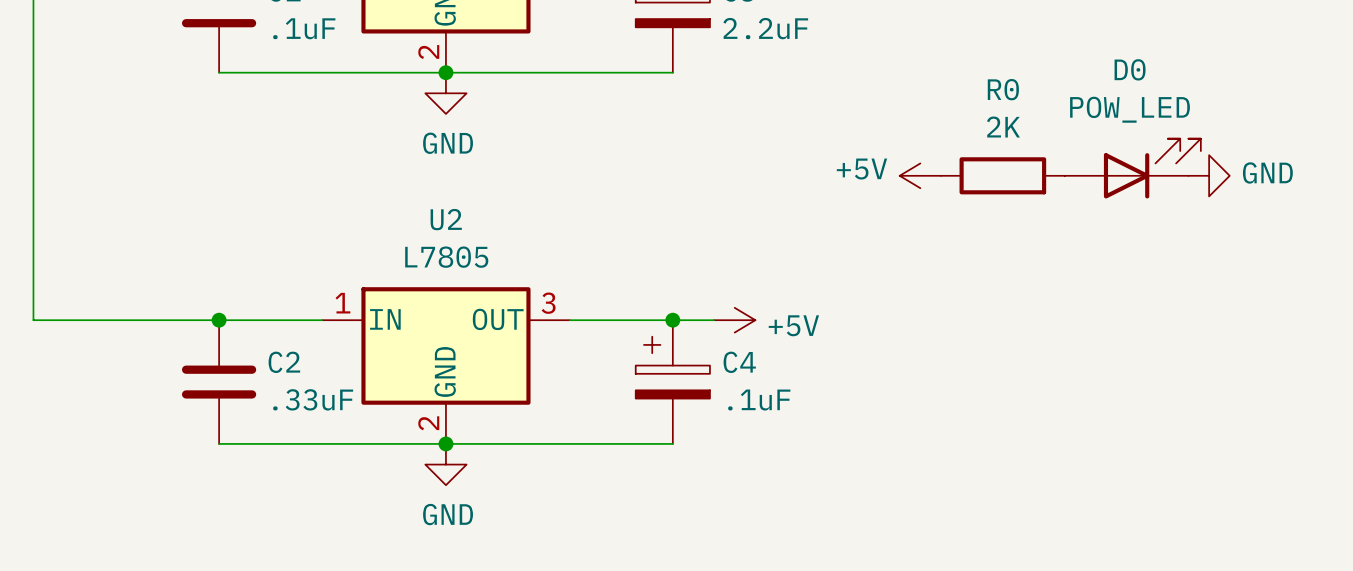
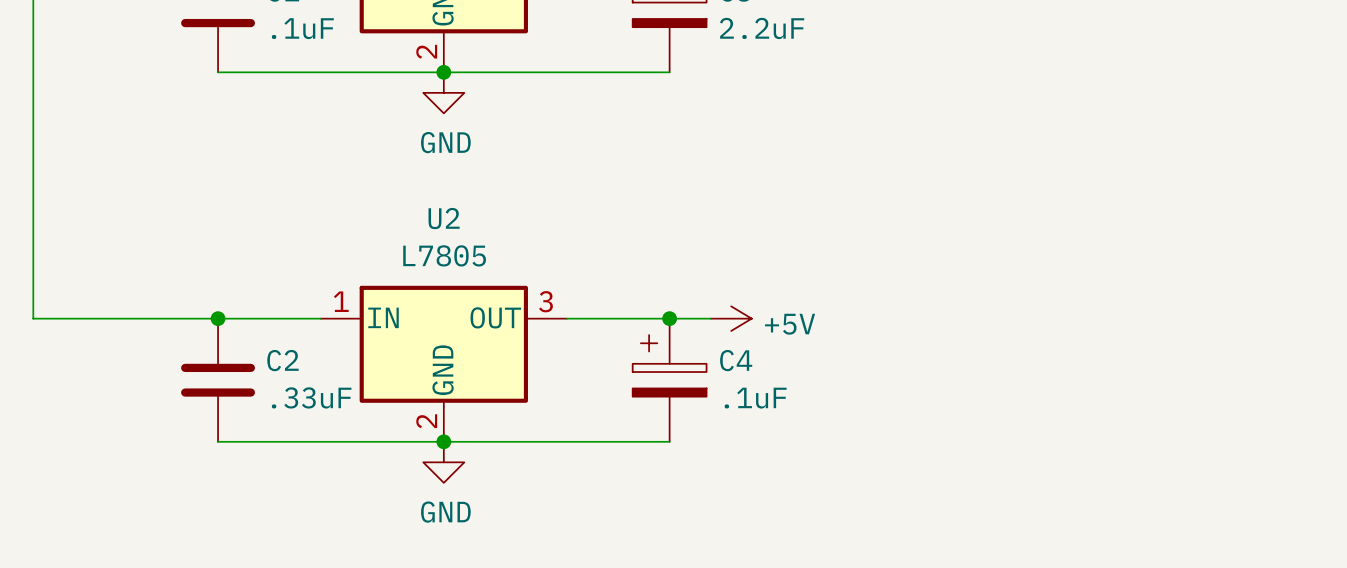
D0: POW_LED (1132, 168) -> none
power symbol: +5V (920, 175) -> none
R0: 2K (1002, 175) -> none
power symbol: GND (1209, 175) -> none

